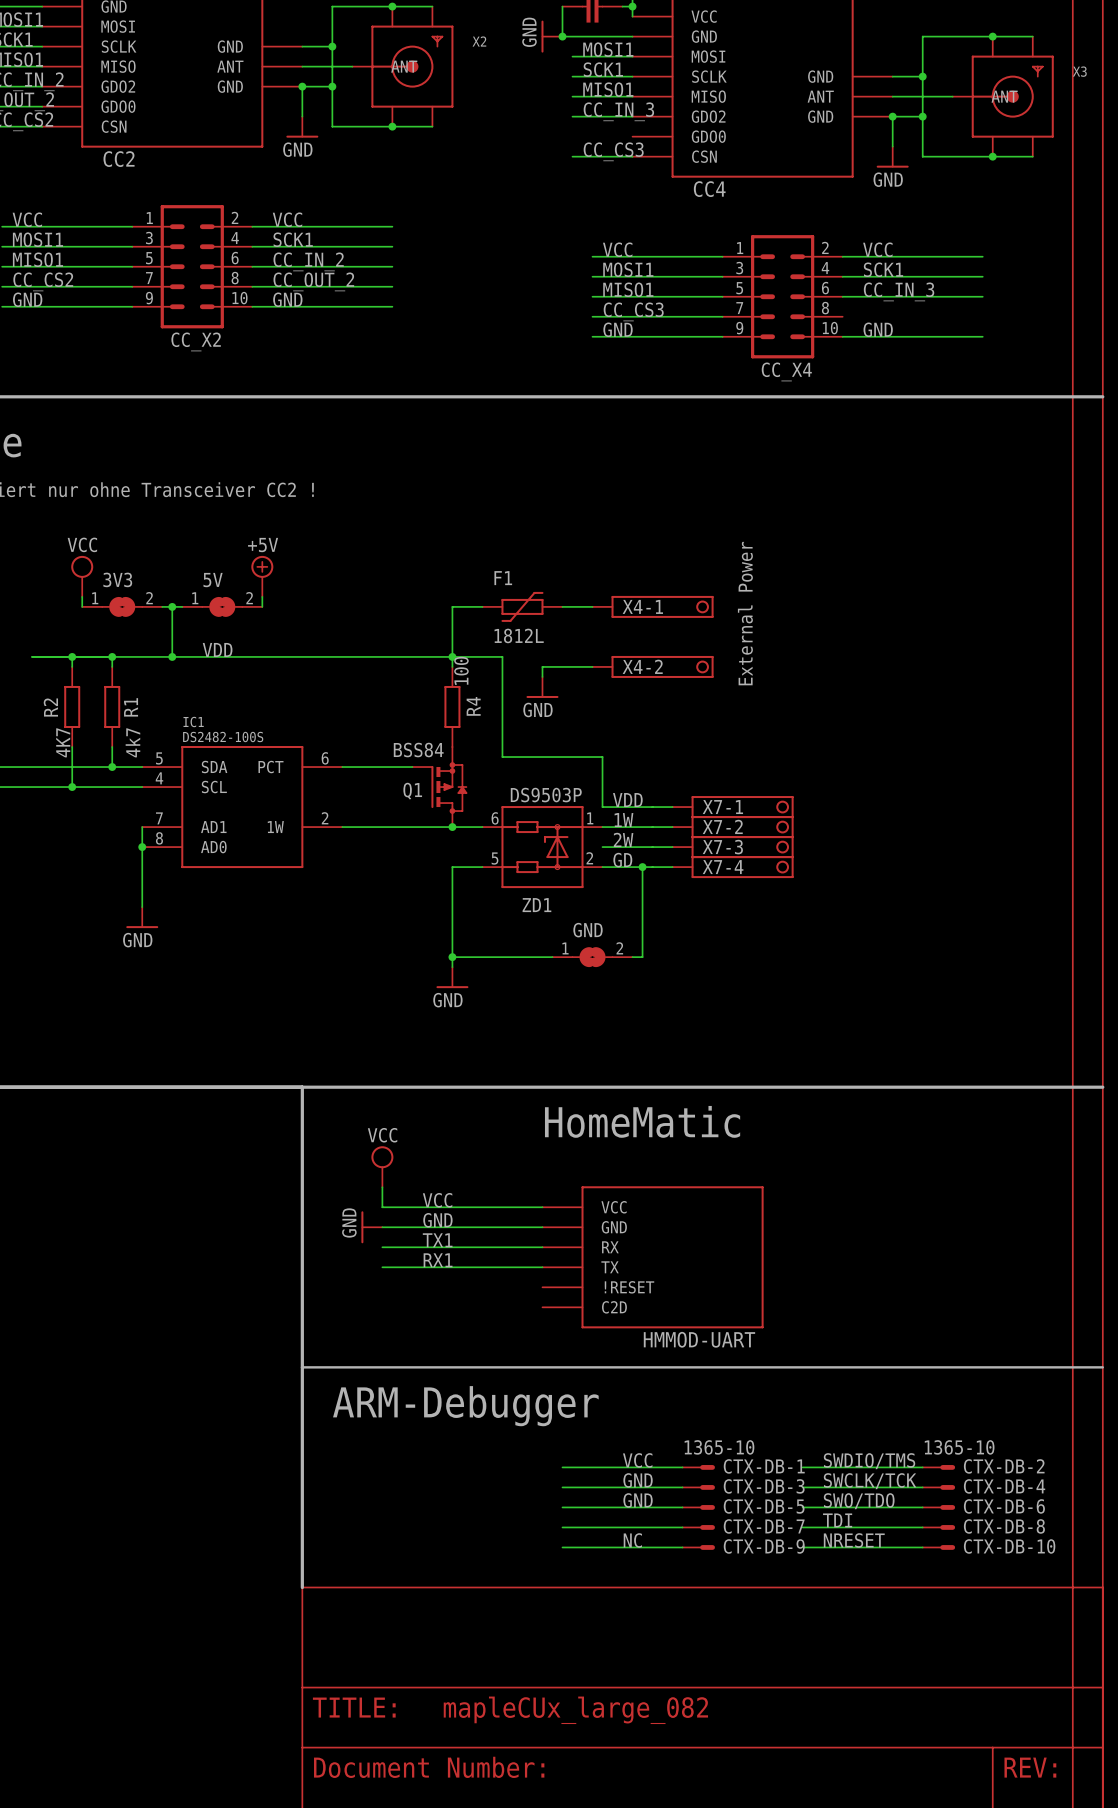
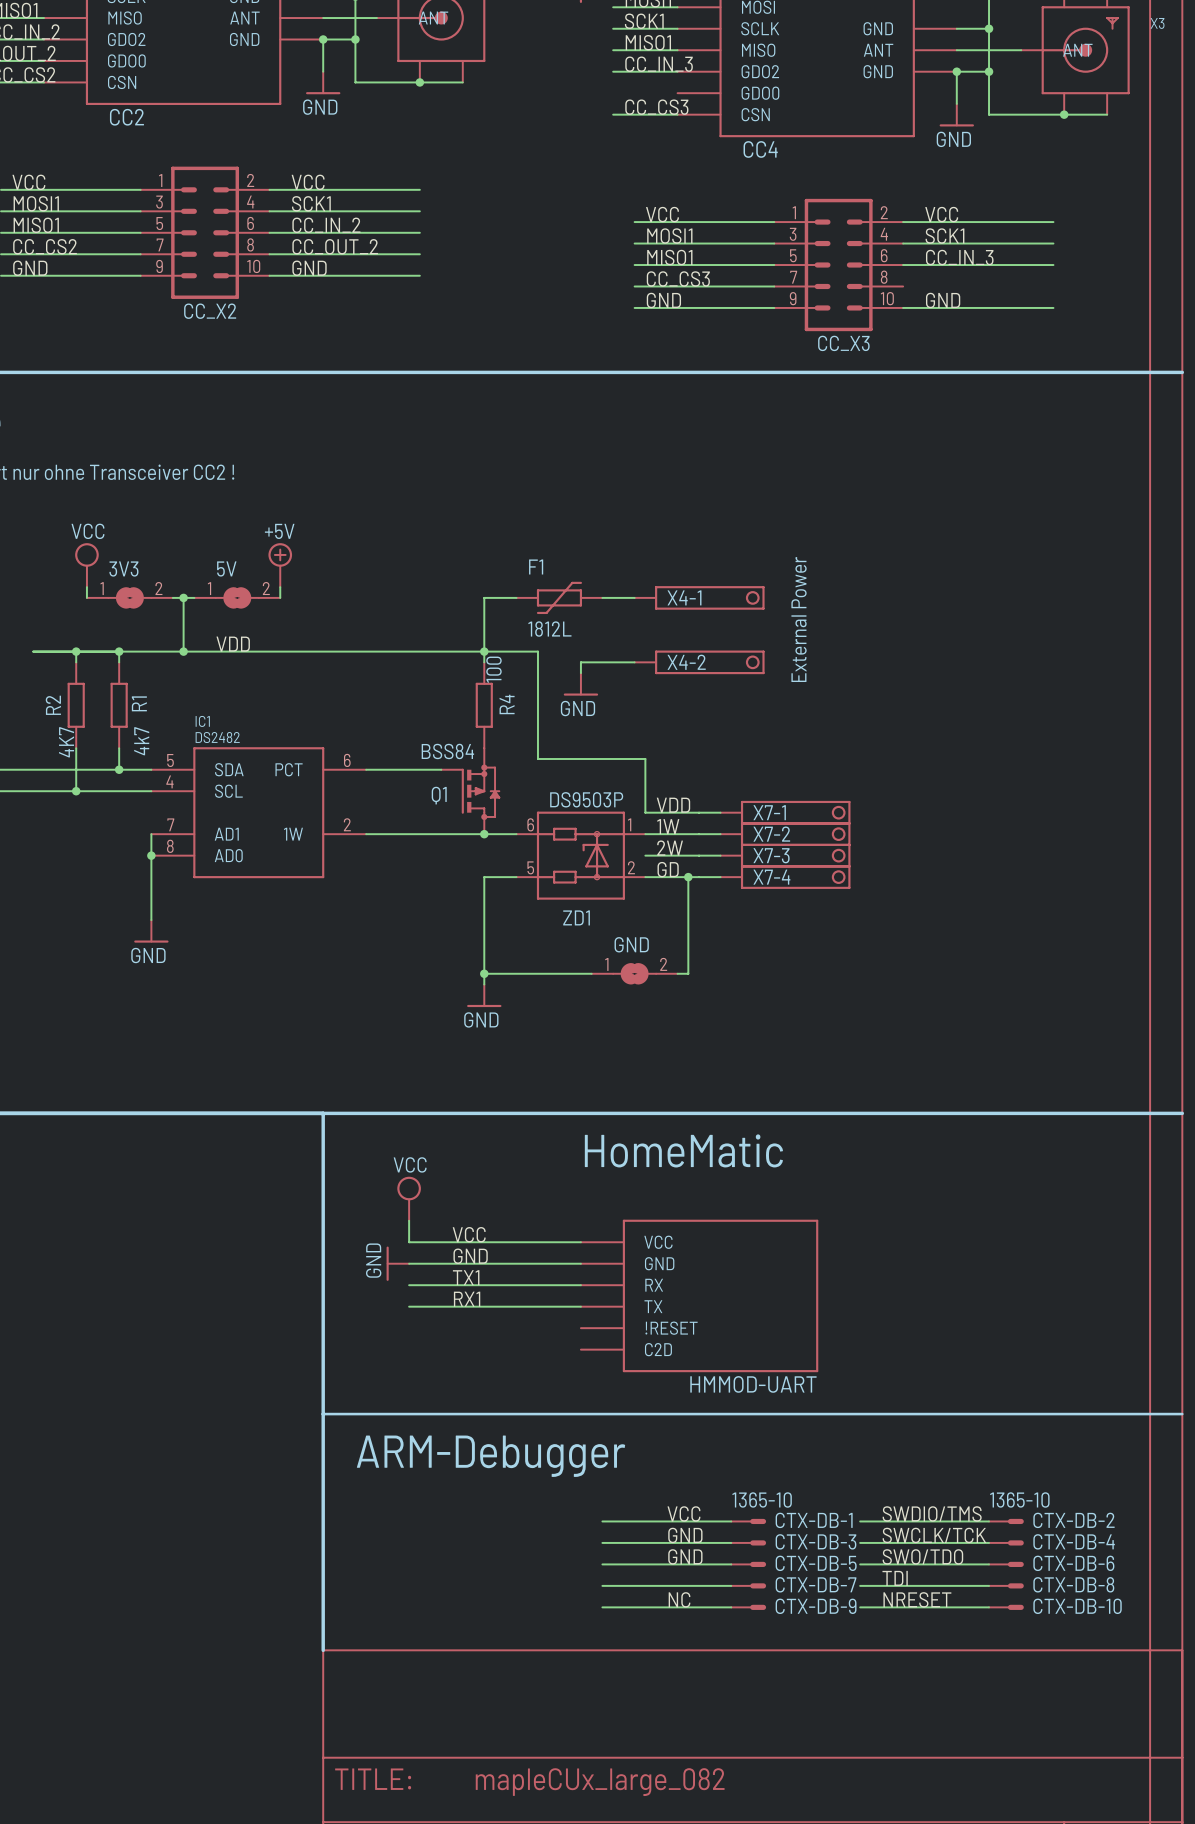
CC_X4 name: CC_X4 (786, 371) -> CC_X3 (843, 343)
IC1 value: DS2482-100S (223, 737) -> DS2482 (217, 737)

